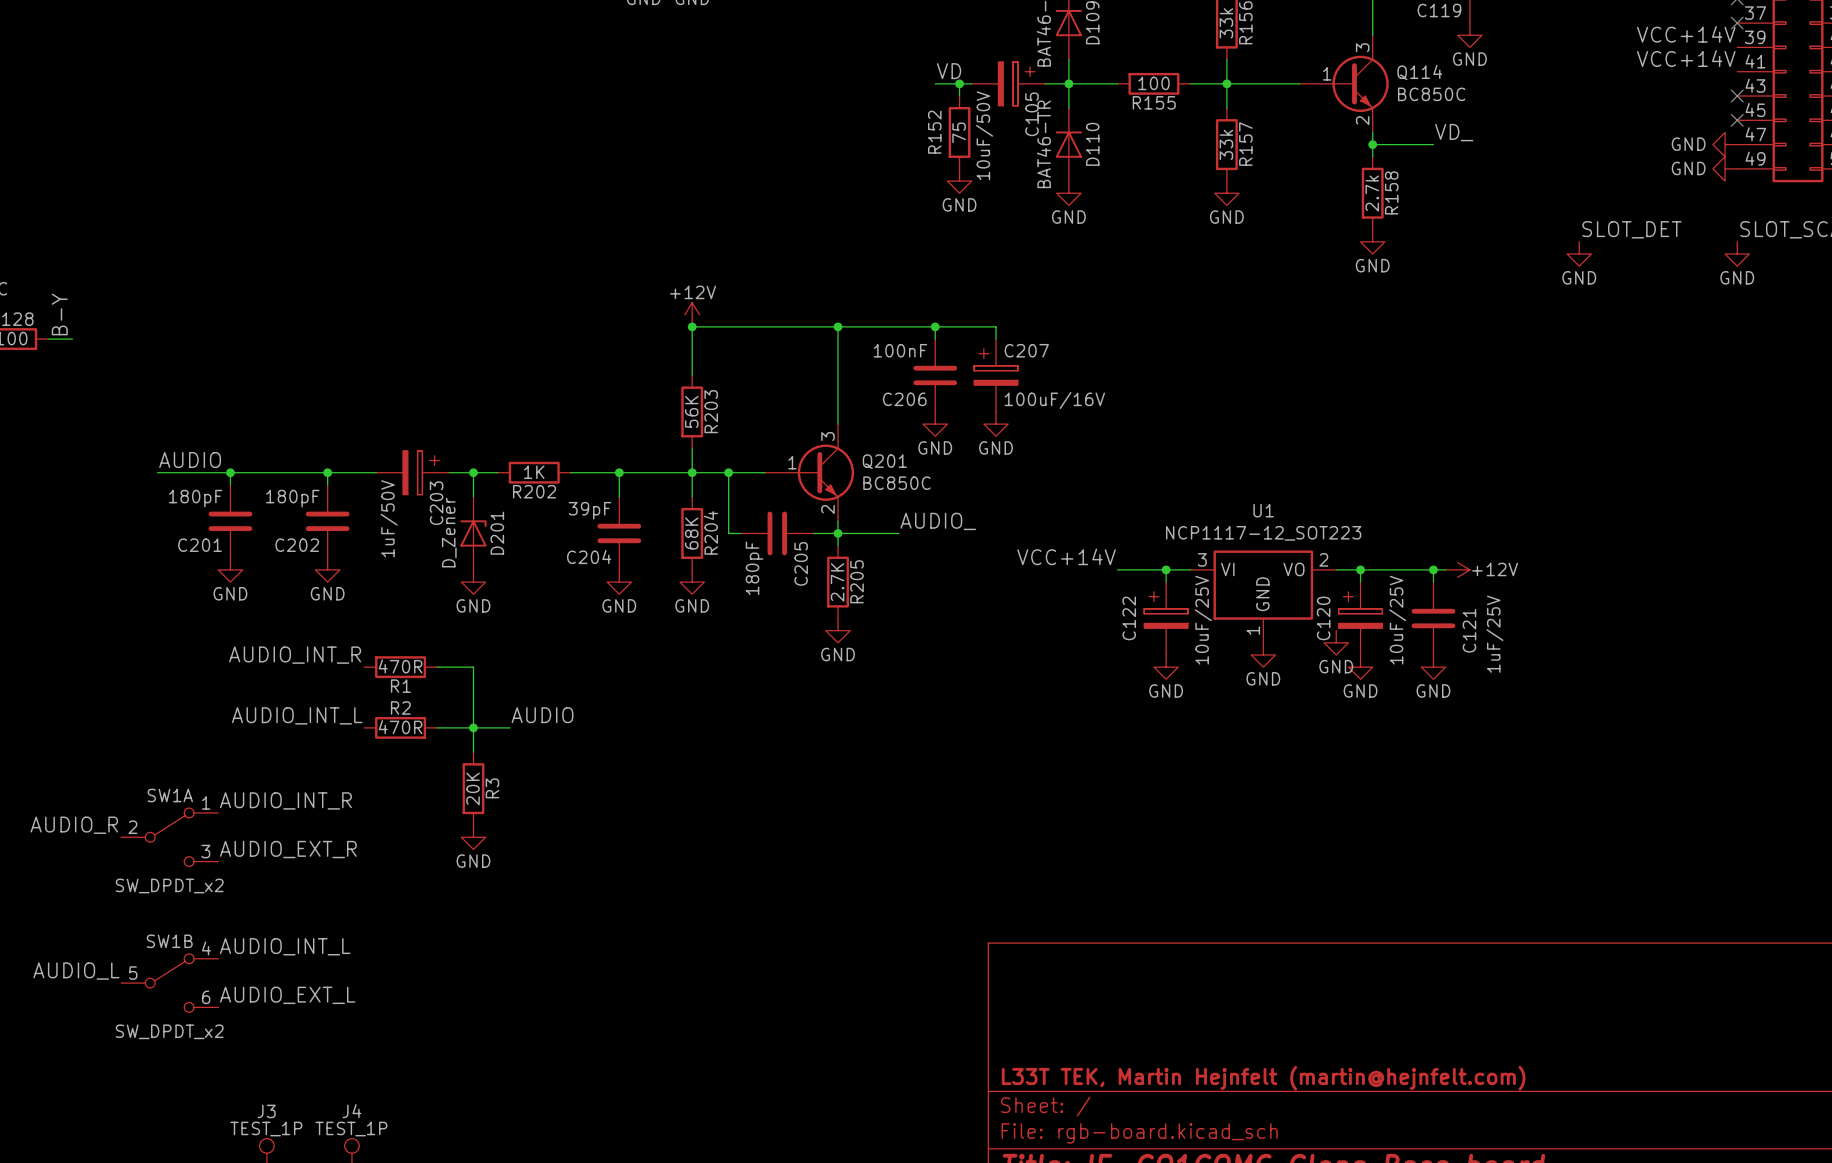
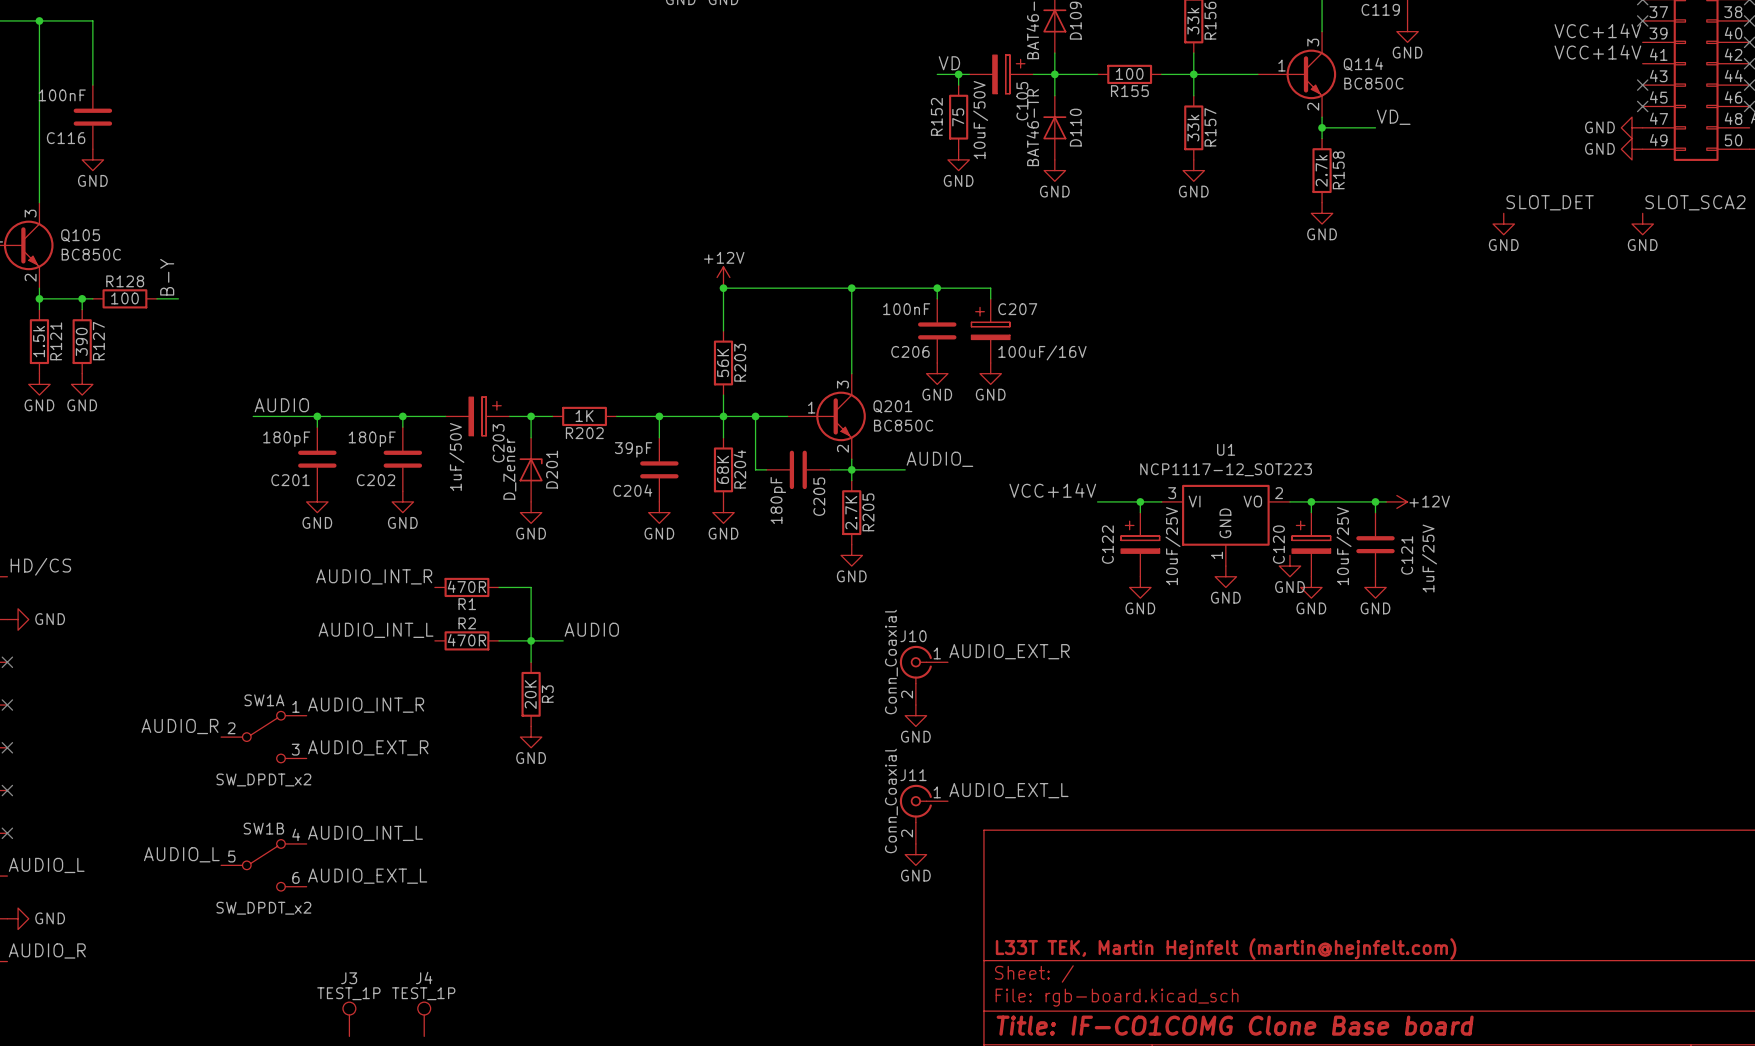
label: none -> AUDIO_EXT_R (1009, 651)
J10: none -> Conn_Coaxial (923, 675)
power symbol: none -> GND (915, 715)
label: none -> AUDIO_EXT_L (1008, 790)
J11: none -> Conn_Coaxial (923, 814)
power symbol: none -> GND (915, 854)

